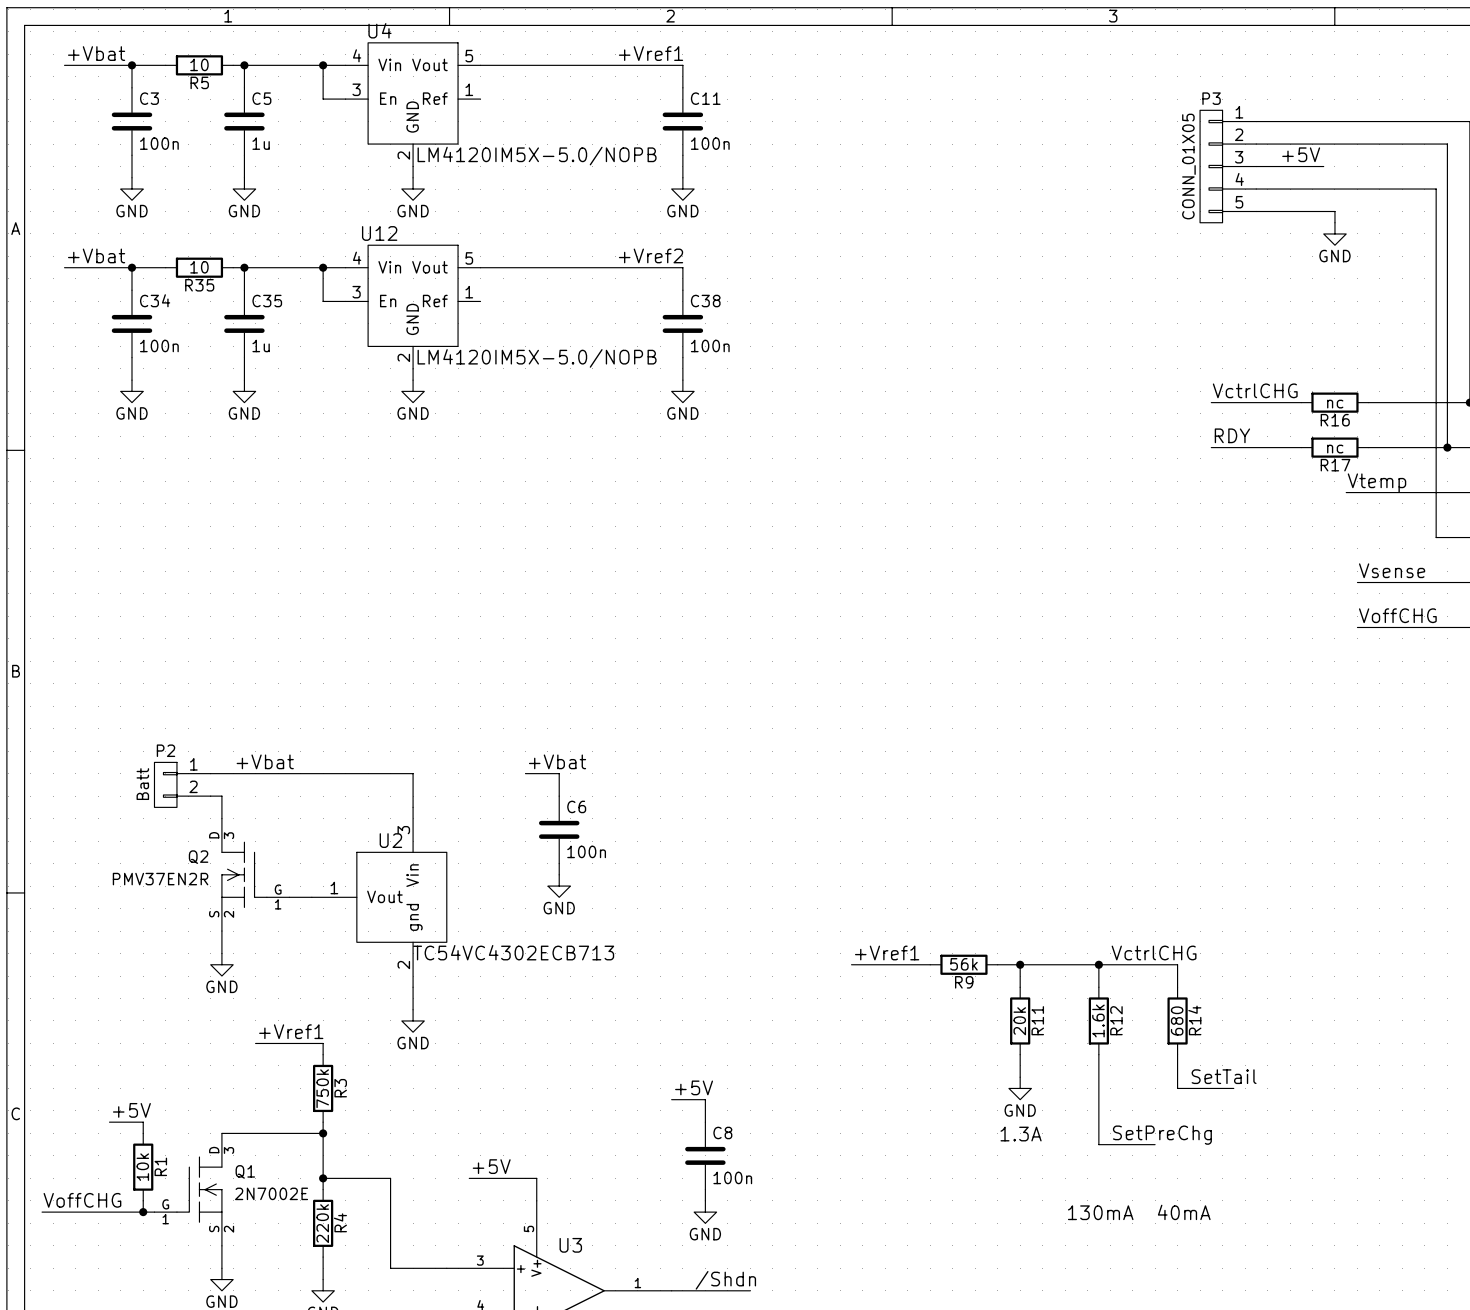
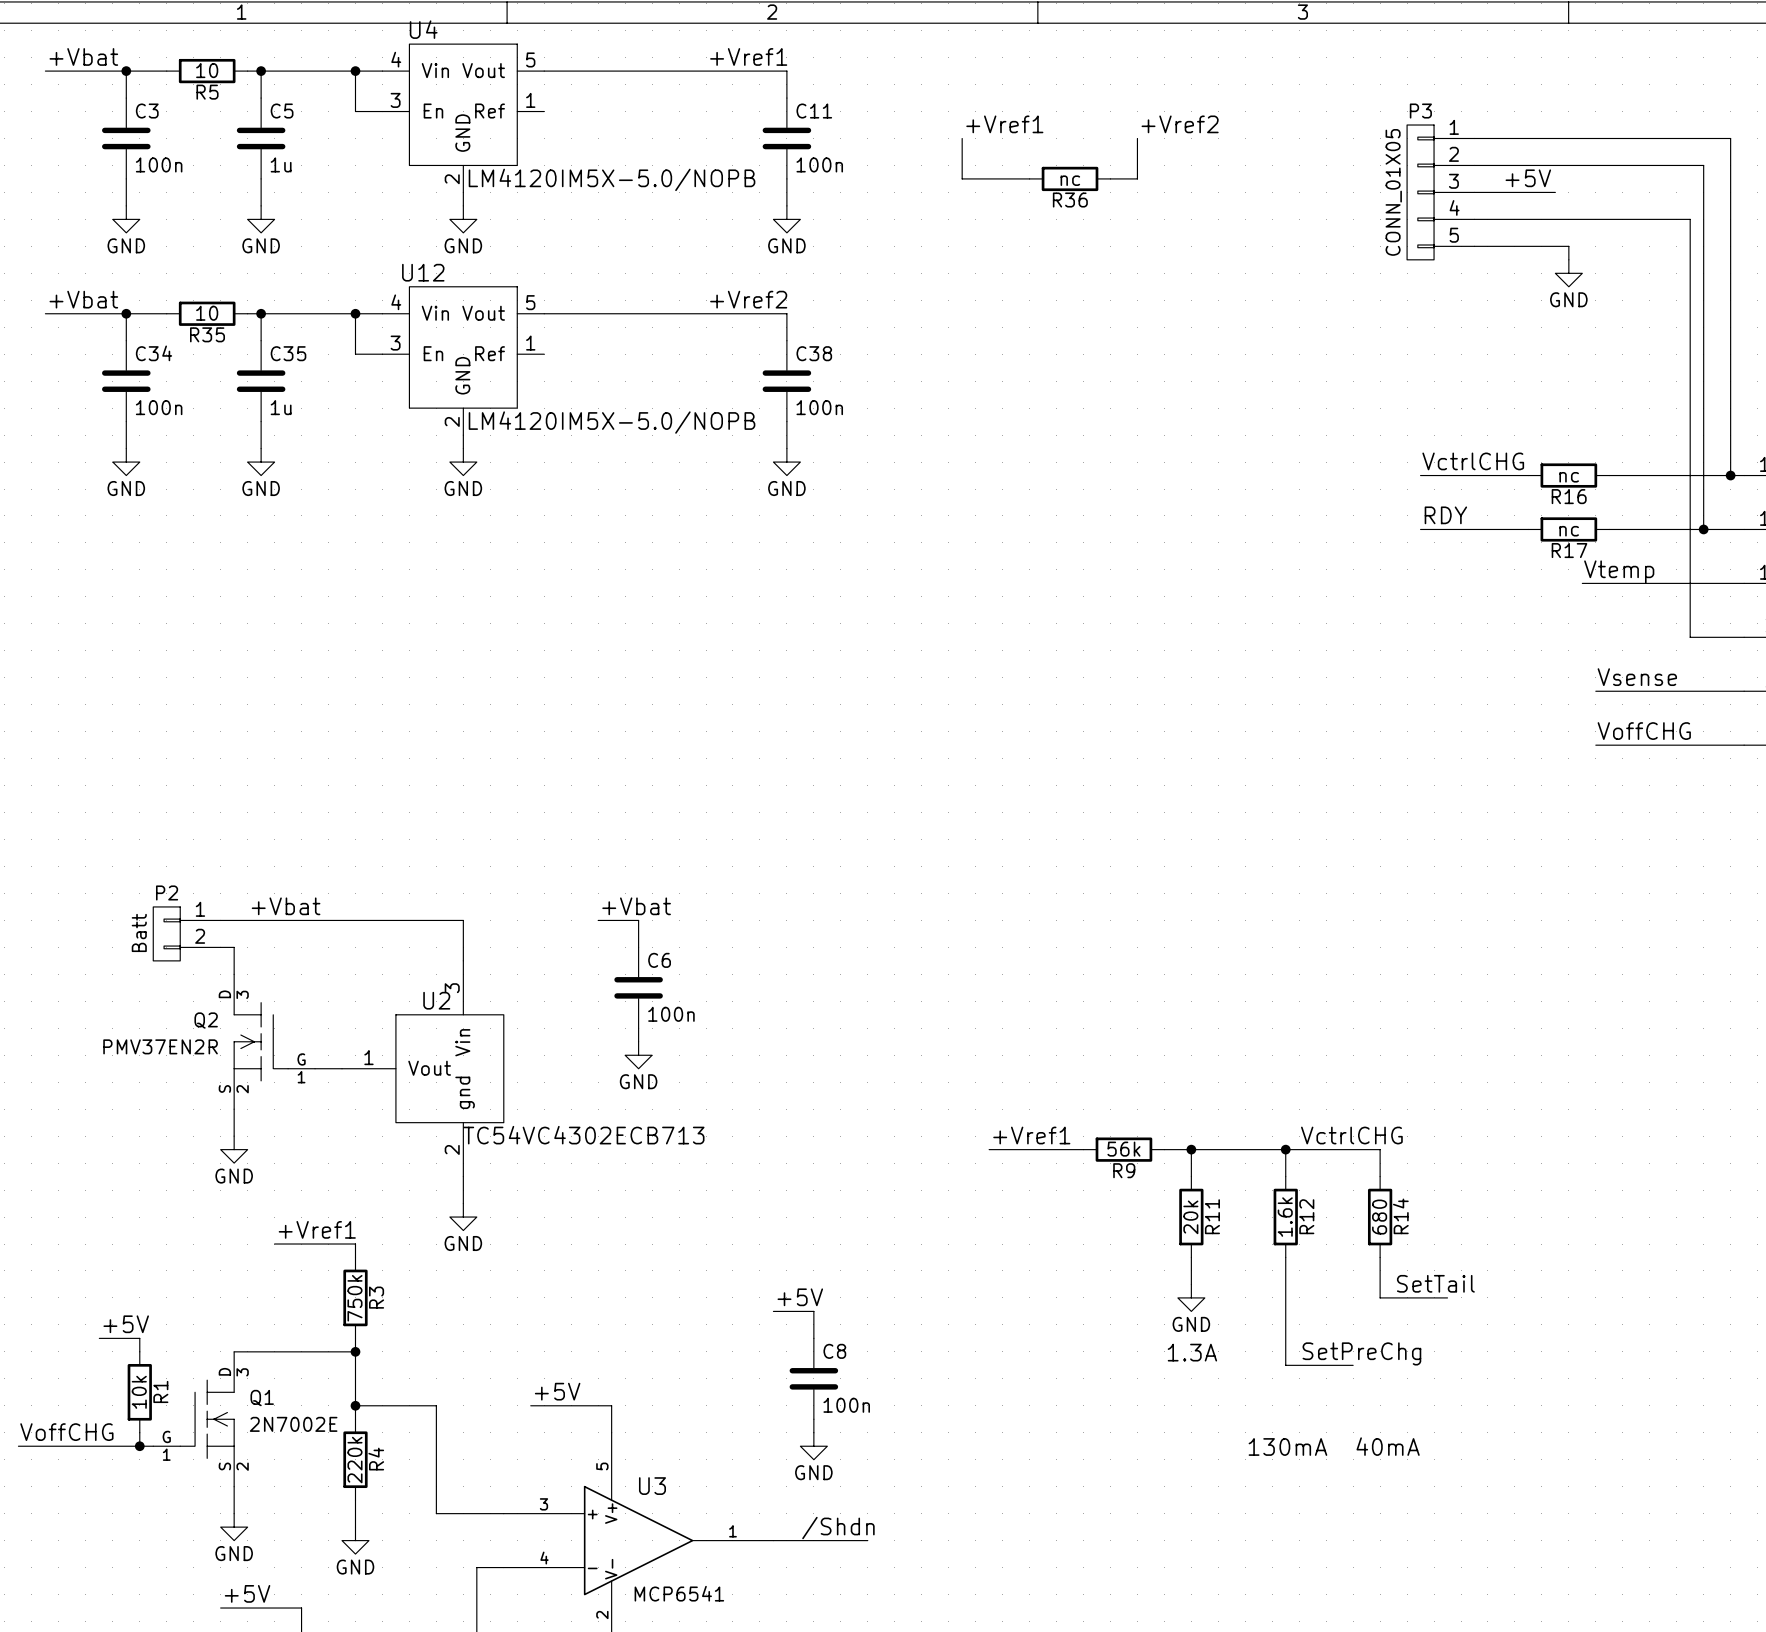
label: none -> +Vref1 (1004, 124)
label: none -> +Vref2 (1180, 124)
wire: none -> (962, 138) (962, 178) (1029, 178)
wire: none -> (1137, 138) (1137, 178) (1110, 178)
R36: none -> nc (1070, 178)

